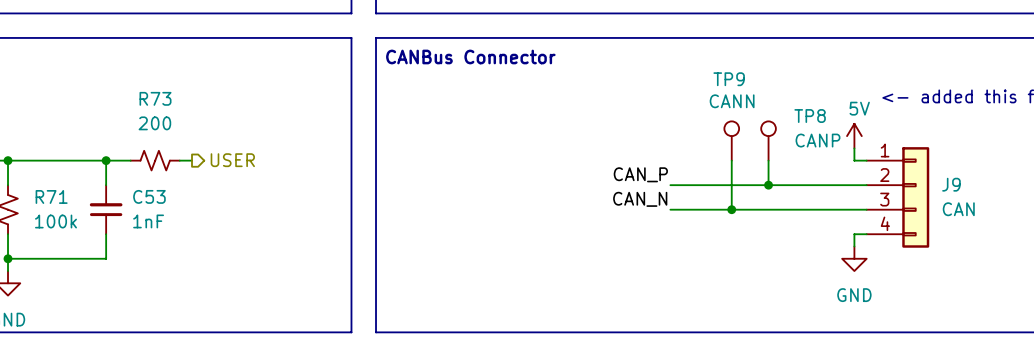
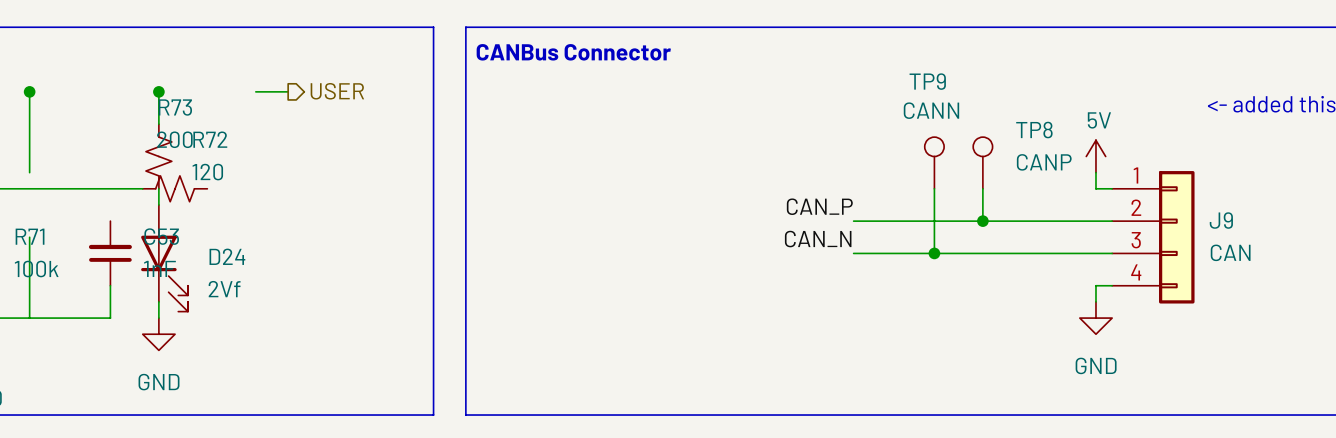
wire: none -> (29, 91) (29, 172)
junction: none -> (29, 91)
junction: none -> (158, 91)
wire: none -> (255, 91) (288, 91)
R72: none -> 120 (158, 156)
wire: (106, 160) (106, 185) -> (158, 91) (158, 124)
junction: (106, 160) -> none
wire: none -> (158, 188) (158, 204)
wire: (179, 160) (192, 160) -> none
hierarchical label position: USER (232, 160) -> USER (337, 91)
wire: none -> (29, 237) (29, 318)
D24: none -> 2Vf (164, 258)
wire: none -> (158, 301) (158, 318)
power symbol: none -> GND (158, 334)

